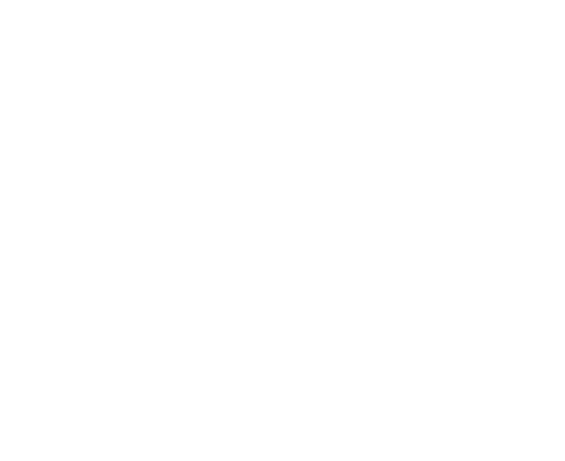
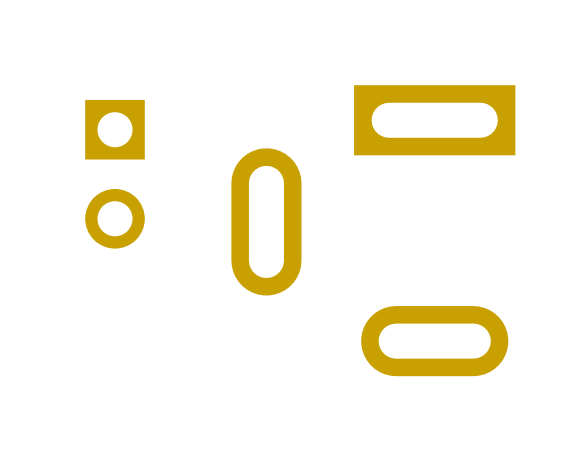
part: none -> (114, 174)
part: none -> (373, 230)

